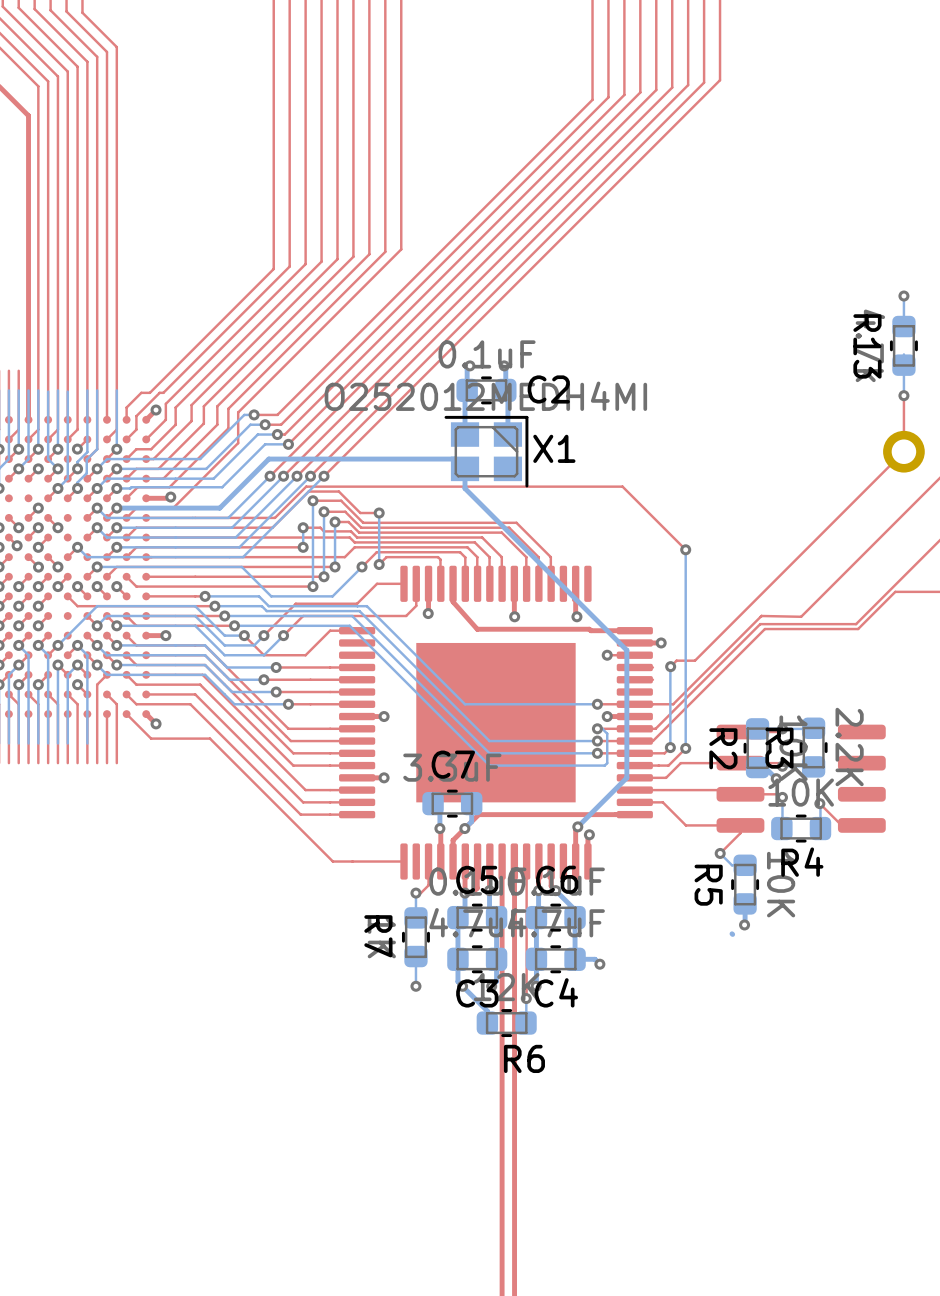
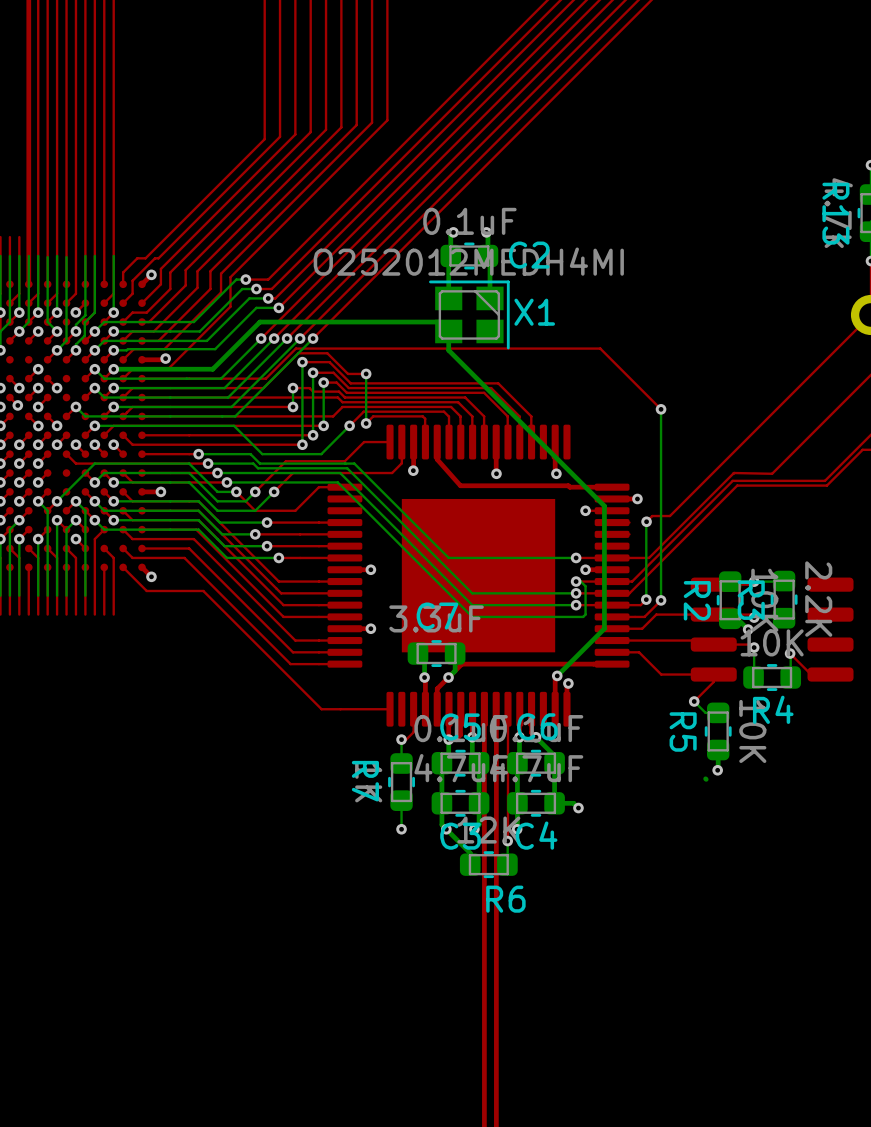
bottom track: (18, 645) (28, 655) (28, 743) -> none

